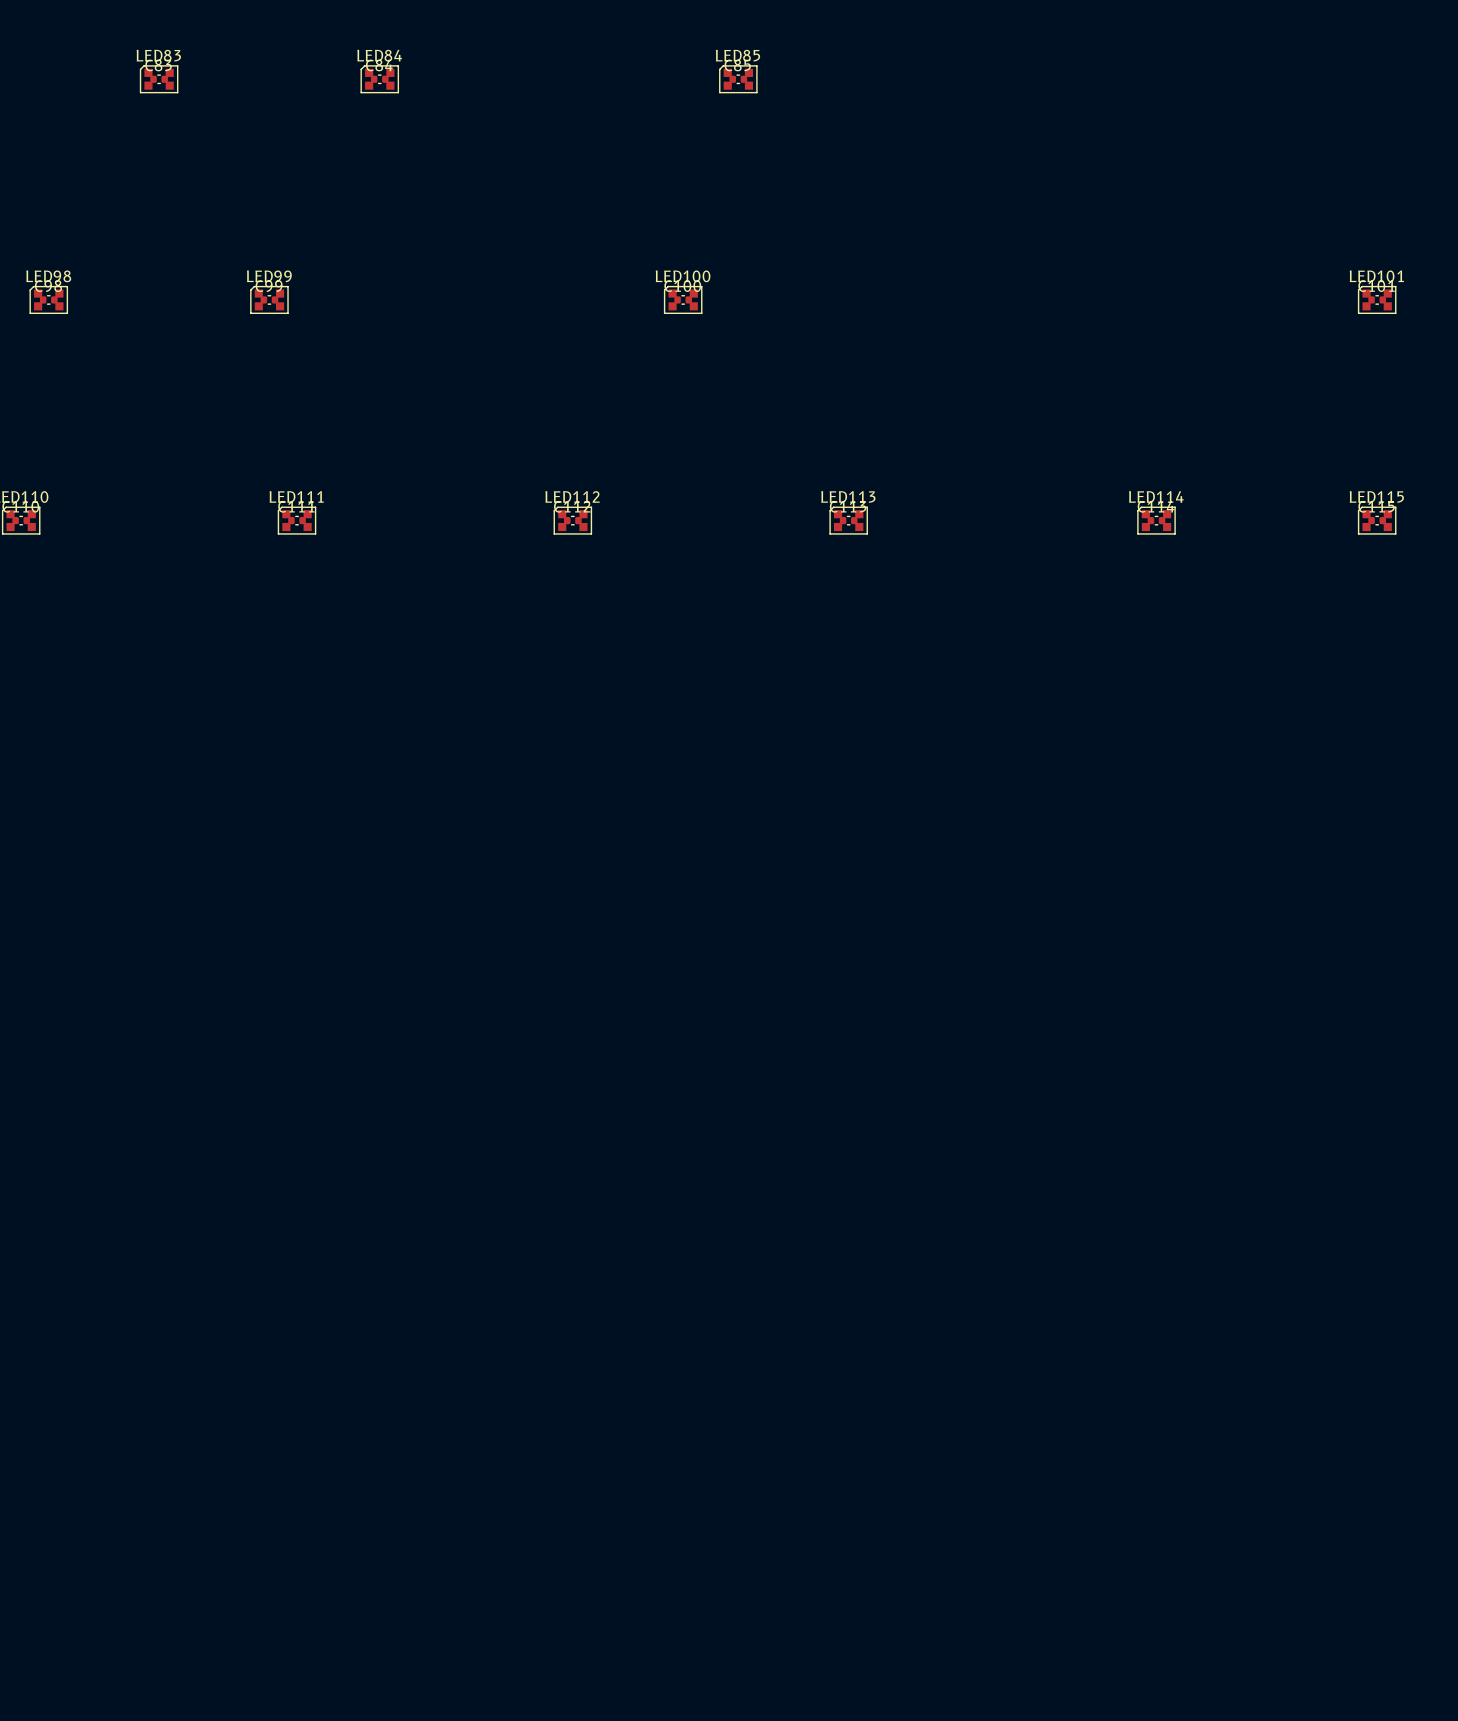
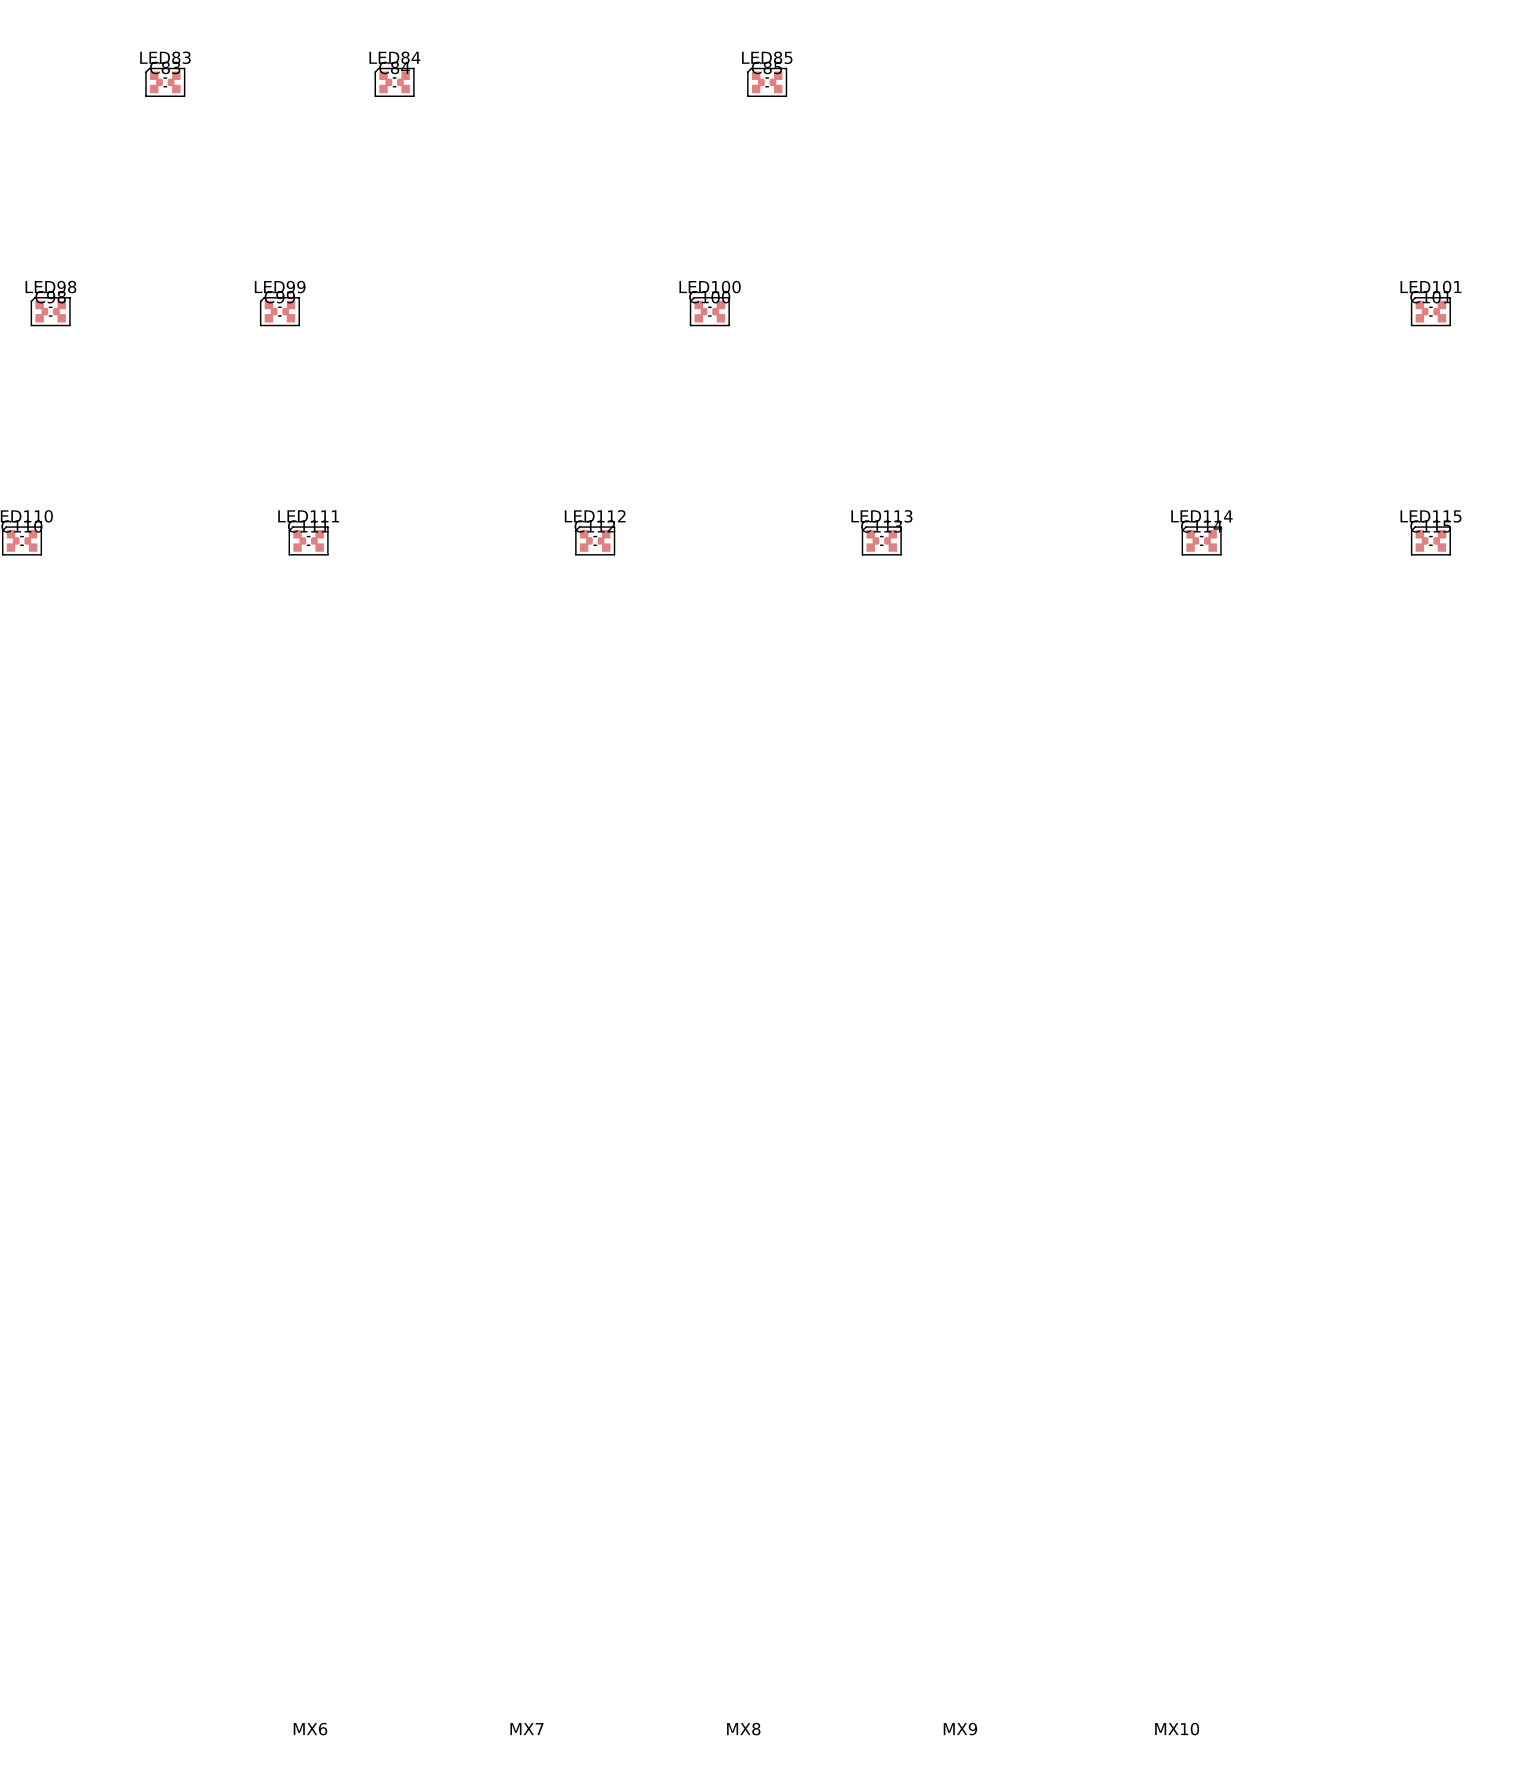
MX6: none -> (310, 1729)
MX7: none -> (526, 1729)
MX8: none -> (743, 1729)
MX9: none -> (960, 1729)
MX10: none -> (1177, 1729)

